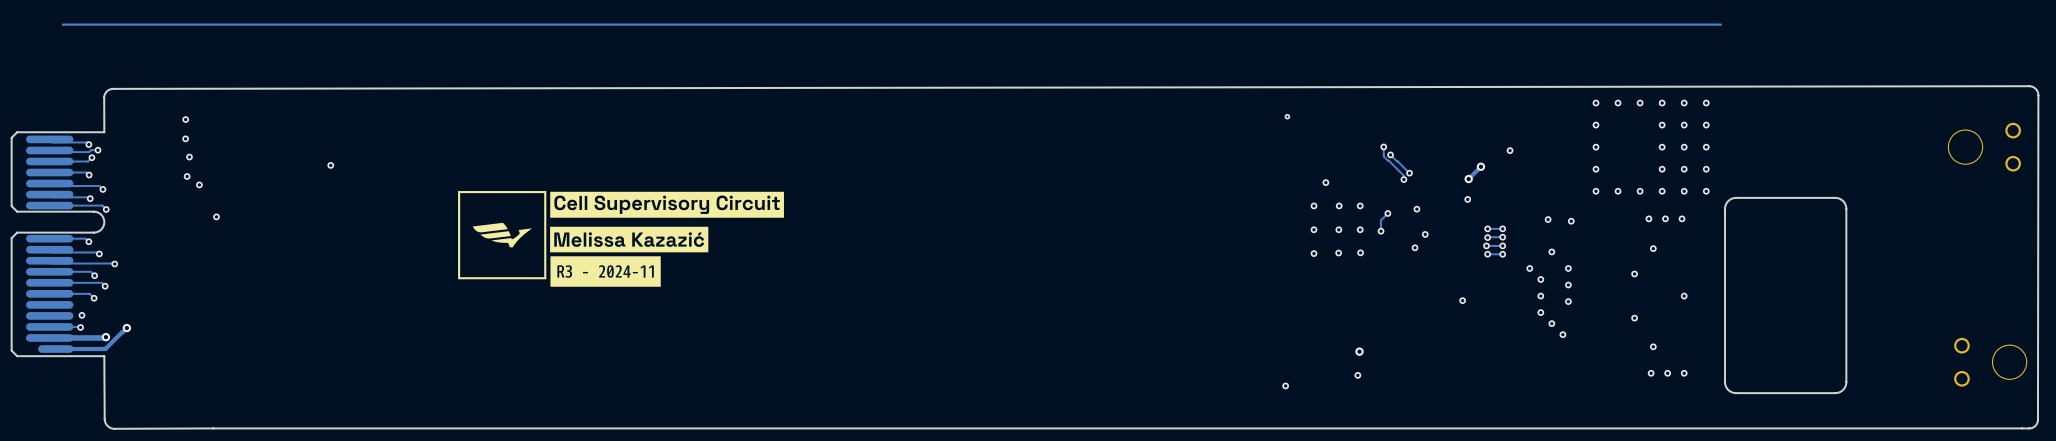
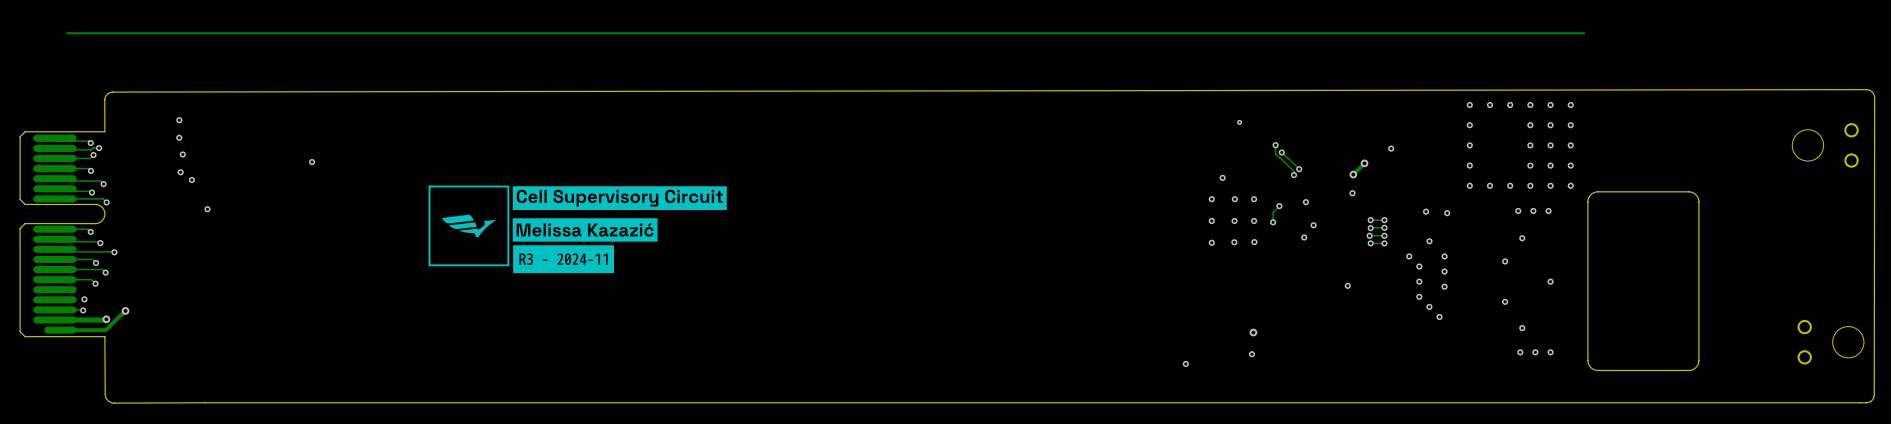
via position: (1287, 116) -> (1239, 122)

